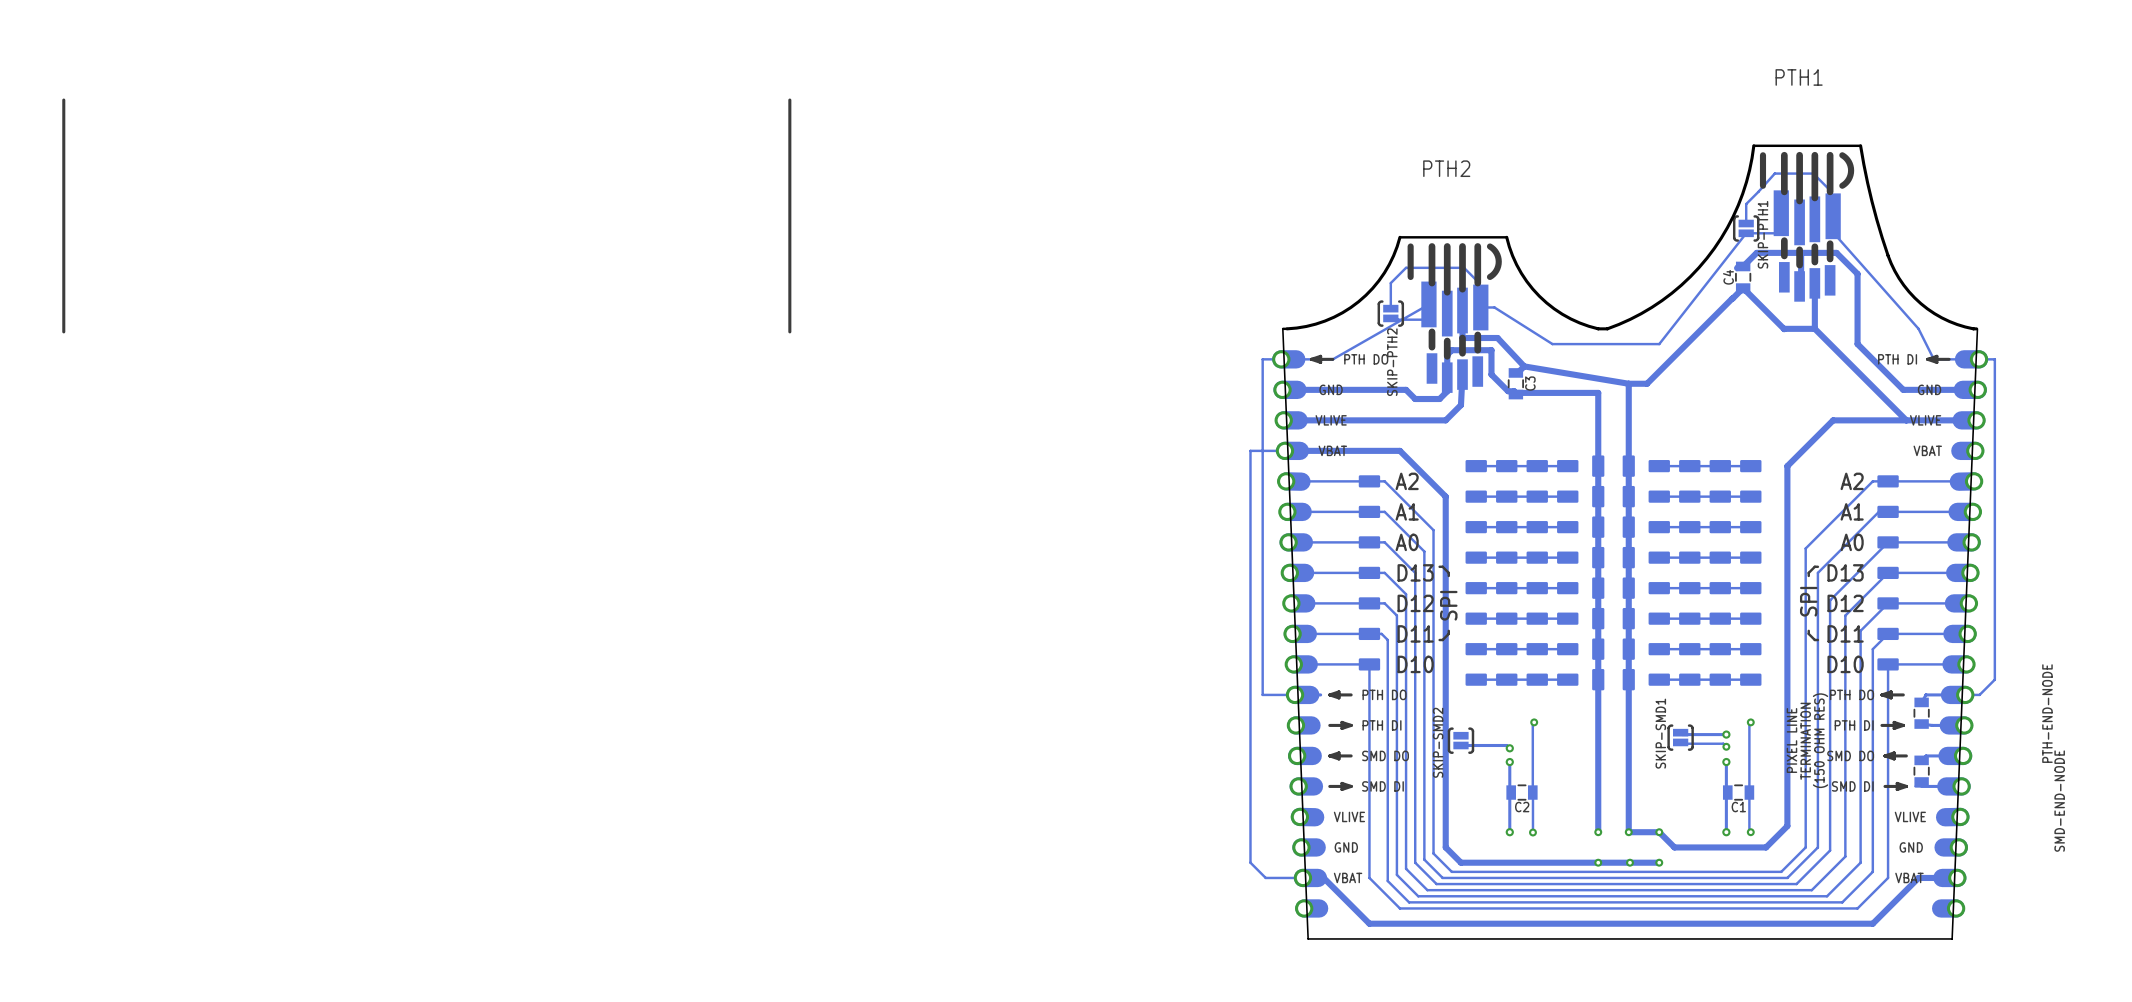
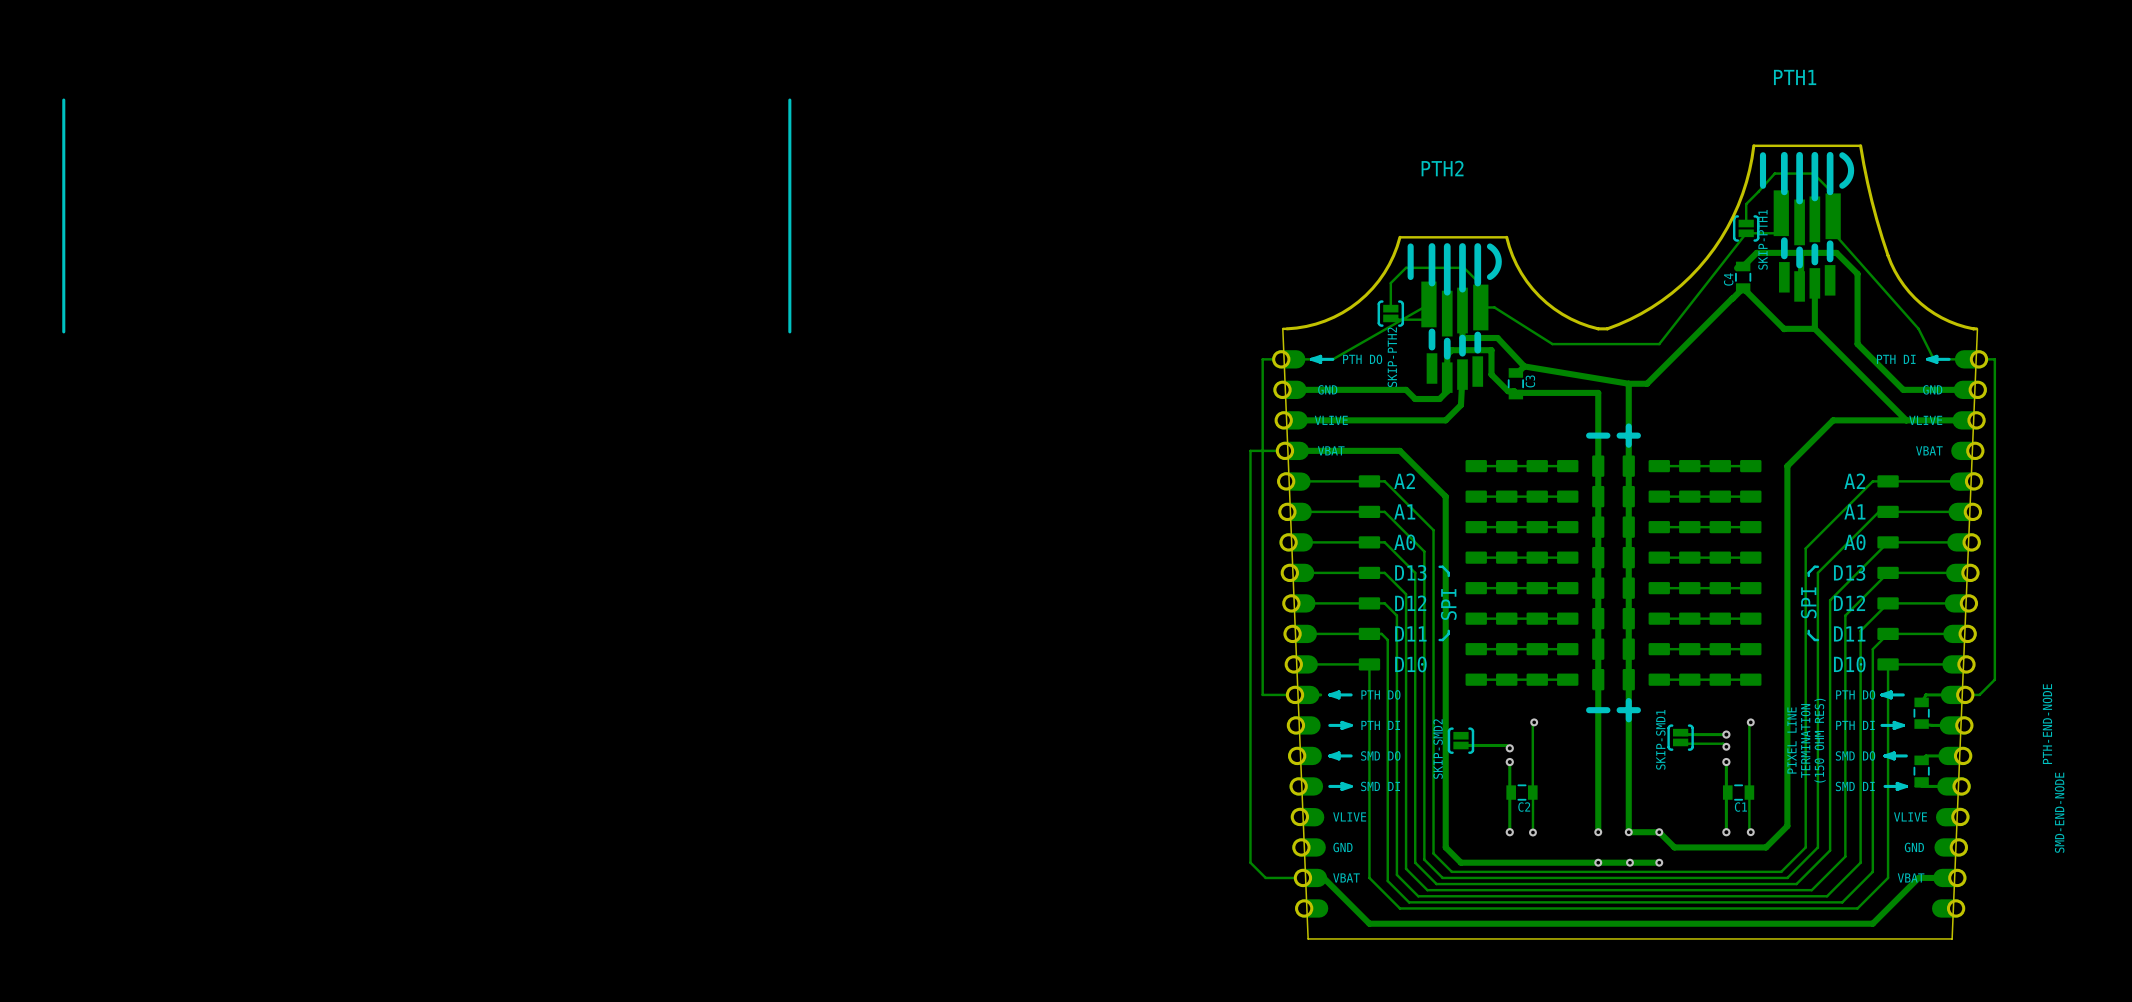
line: none -> (1628, 426) (1628, 444)
line: none -> (1607, 435) (1589, 435)
line: none -> (1637, 435) (1619, 435)
line: none -> (1628, 701) (1628, 719)
line: none -> (1607, 710) (1589, 710)
line: none -> (1637, 710) (1619, 710)

